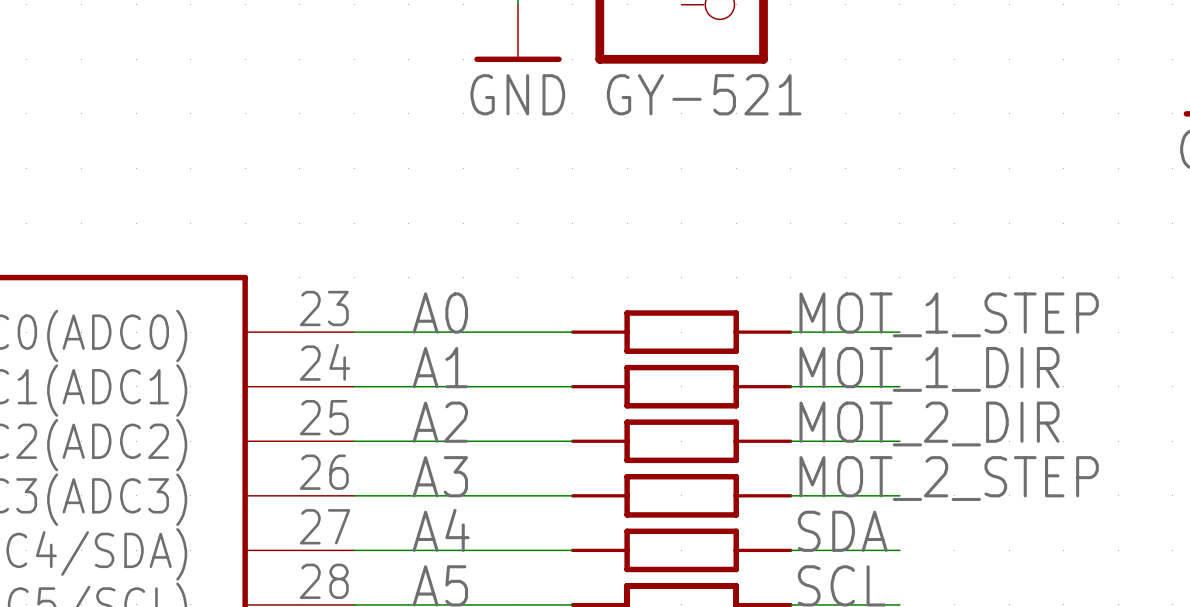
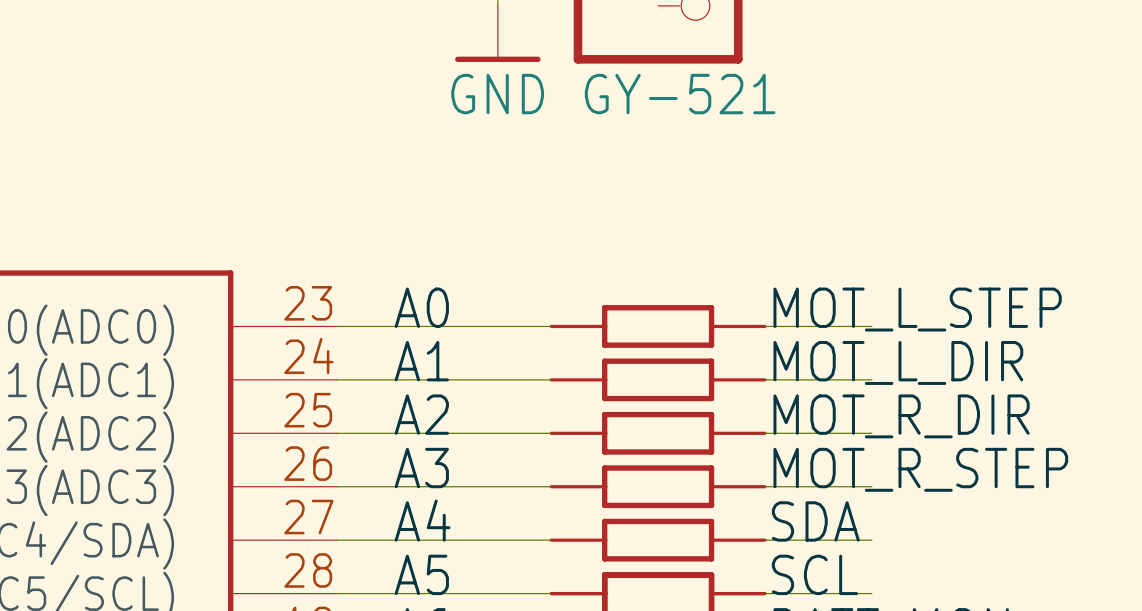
label: MOT_1_STEP (949, 314) -> MOT_L_STEP (917, 309)
label: MOT_1_DIR (929, 369) -> MOT_L_DIR (898, 362)
label: MOT_2_DIR (929, 423) -> MOT_R_DIR (901, 416)
label: MOT_2_STEP (949, 478) -> MOT_R_STEP (920, 469)

